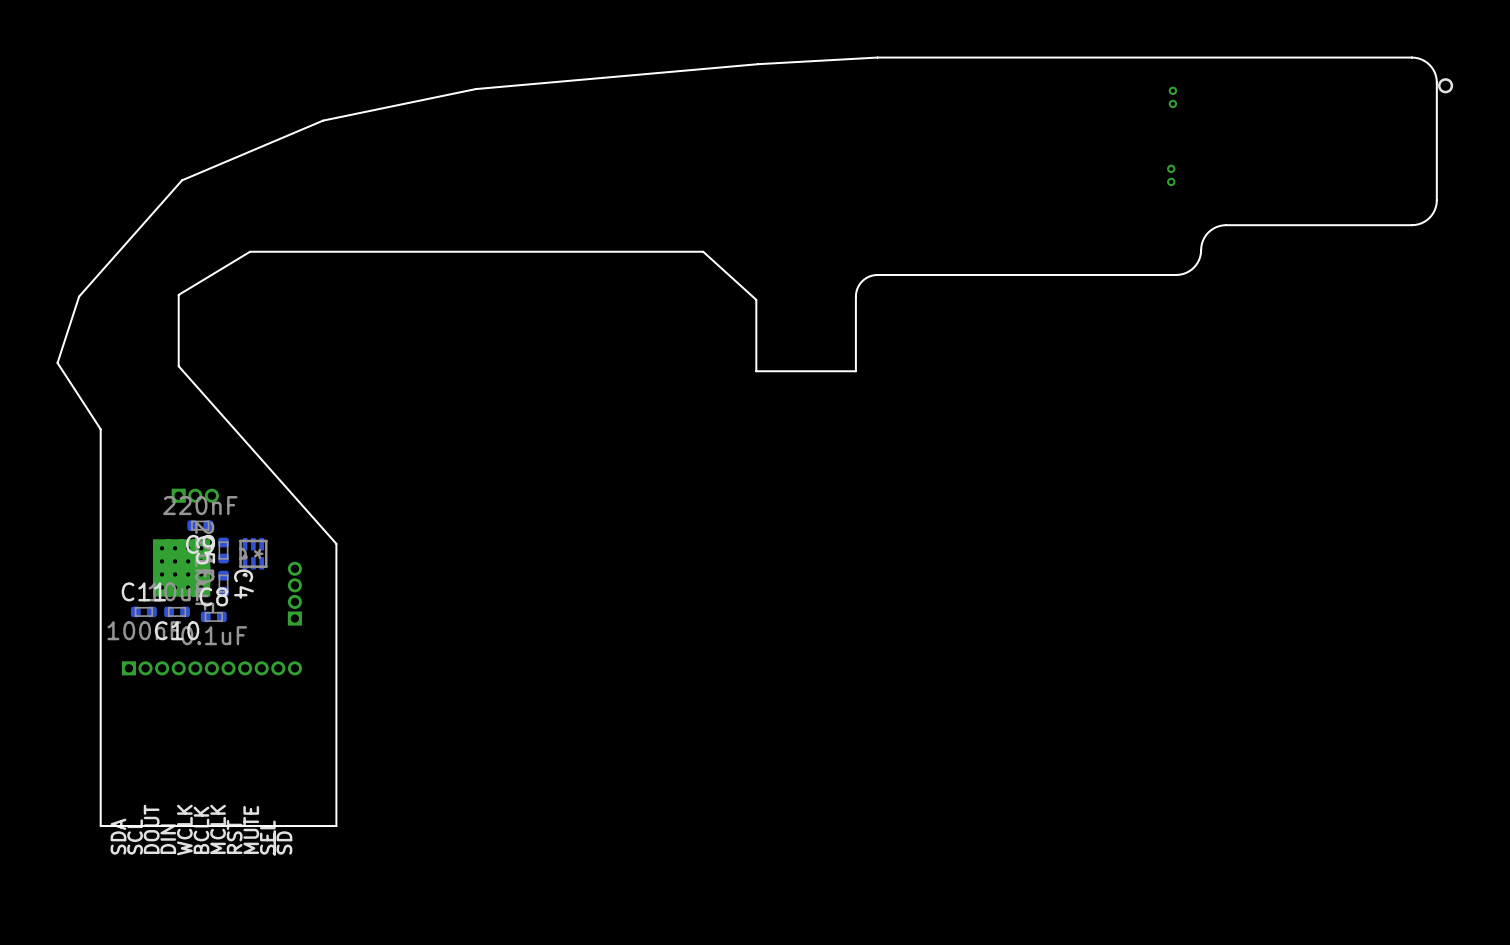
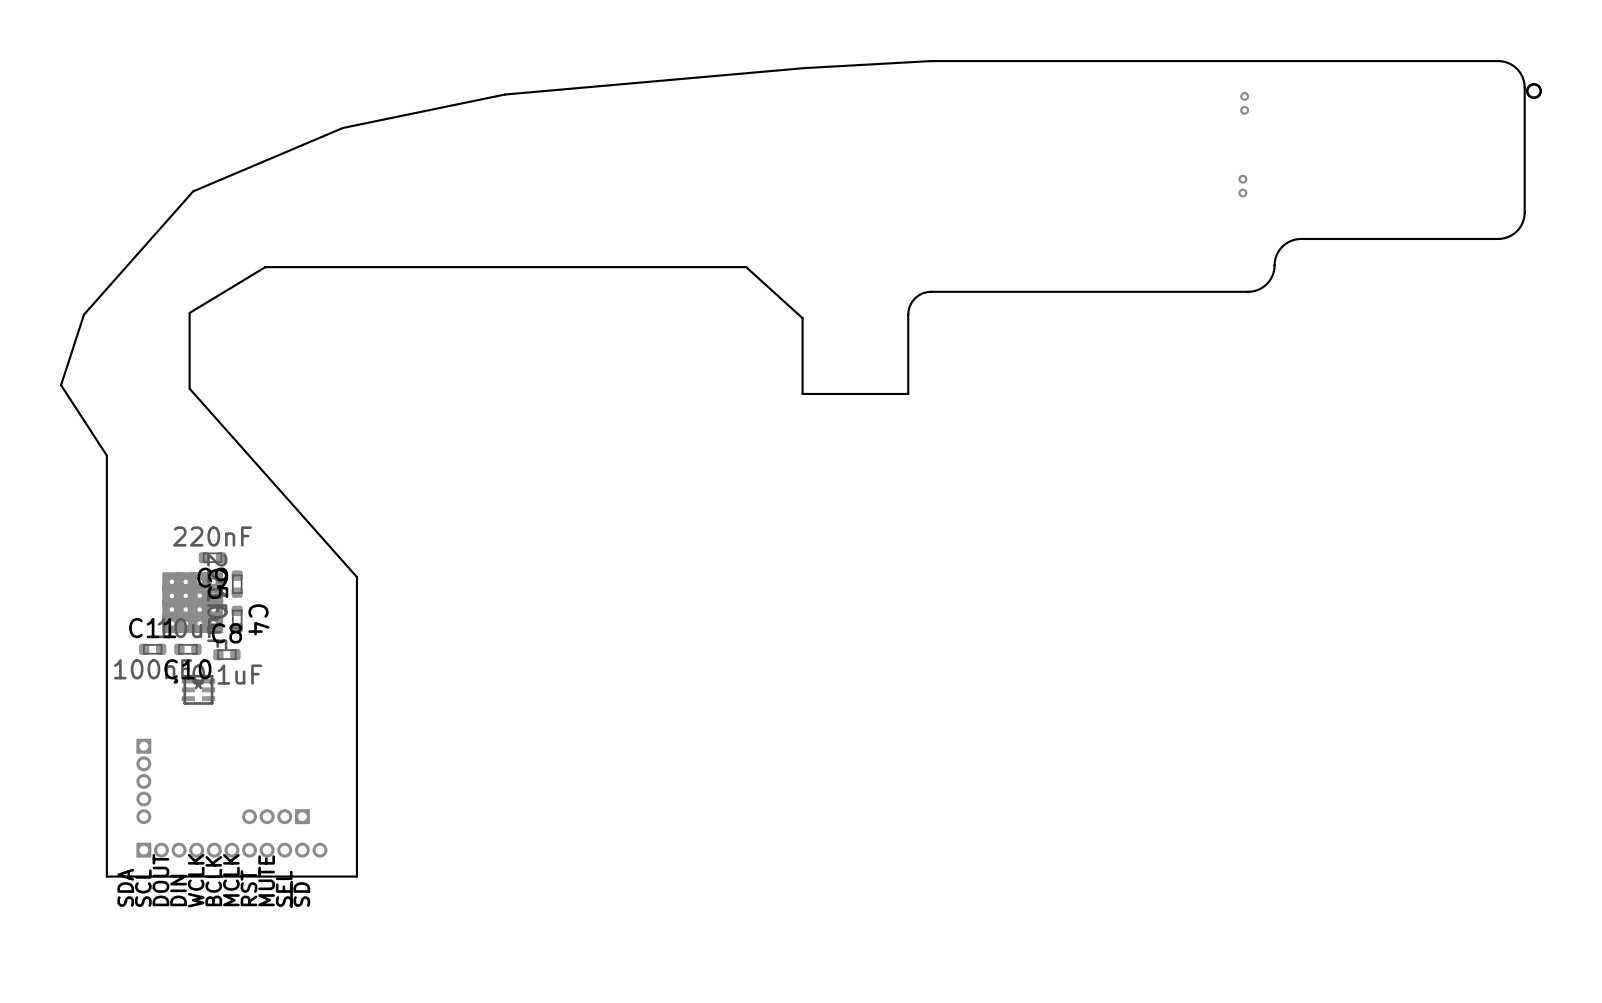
part: (195, 495) -> none
part rotation: 0° (253, 557) -> 90° clockwise (194, 689)
part position: (253, 557) -> (194, 689)
part rotation: 0° (294, 593) -> 90° counterclockwise (275, 816)
part position: (294, 593) -> (275, 816)
part position: (211, 668) -> (231, 850)
part: none -> (143, 781)

